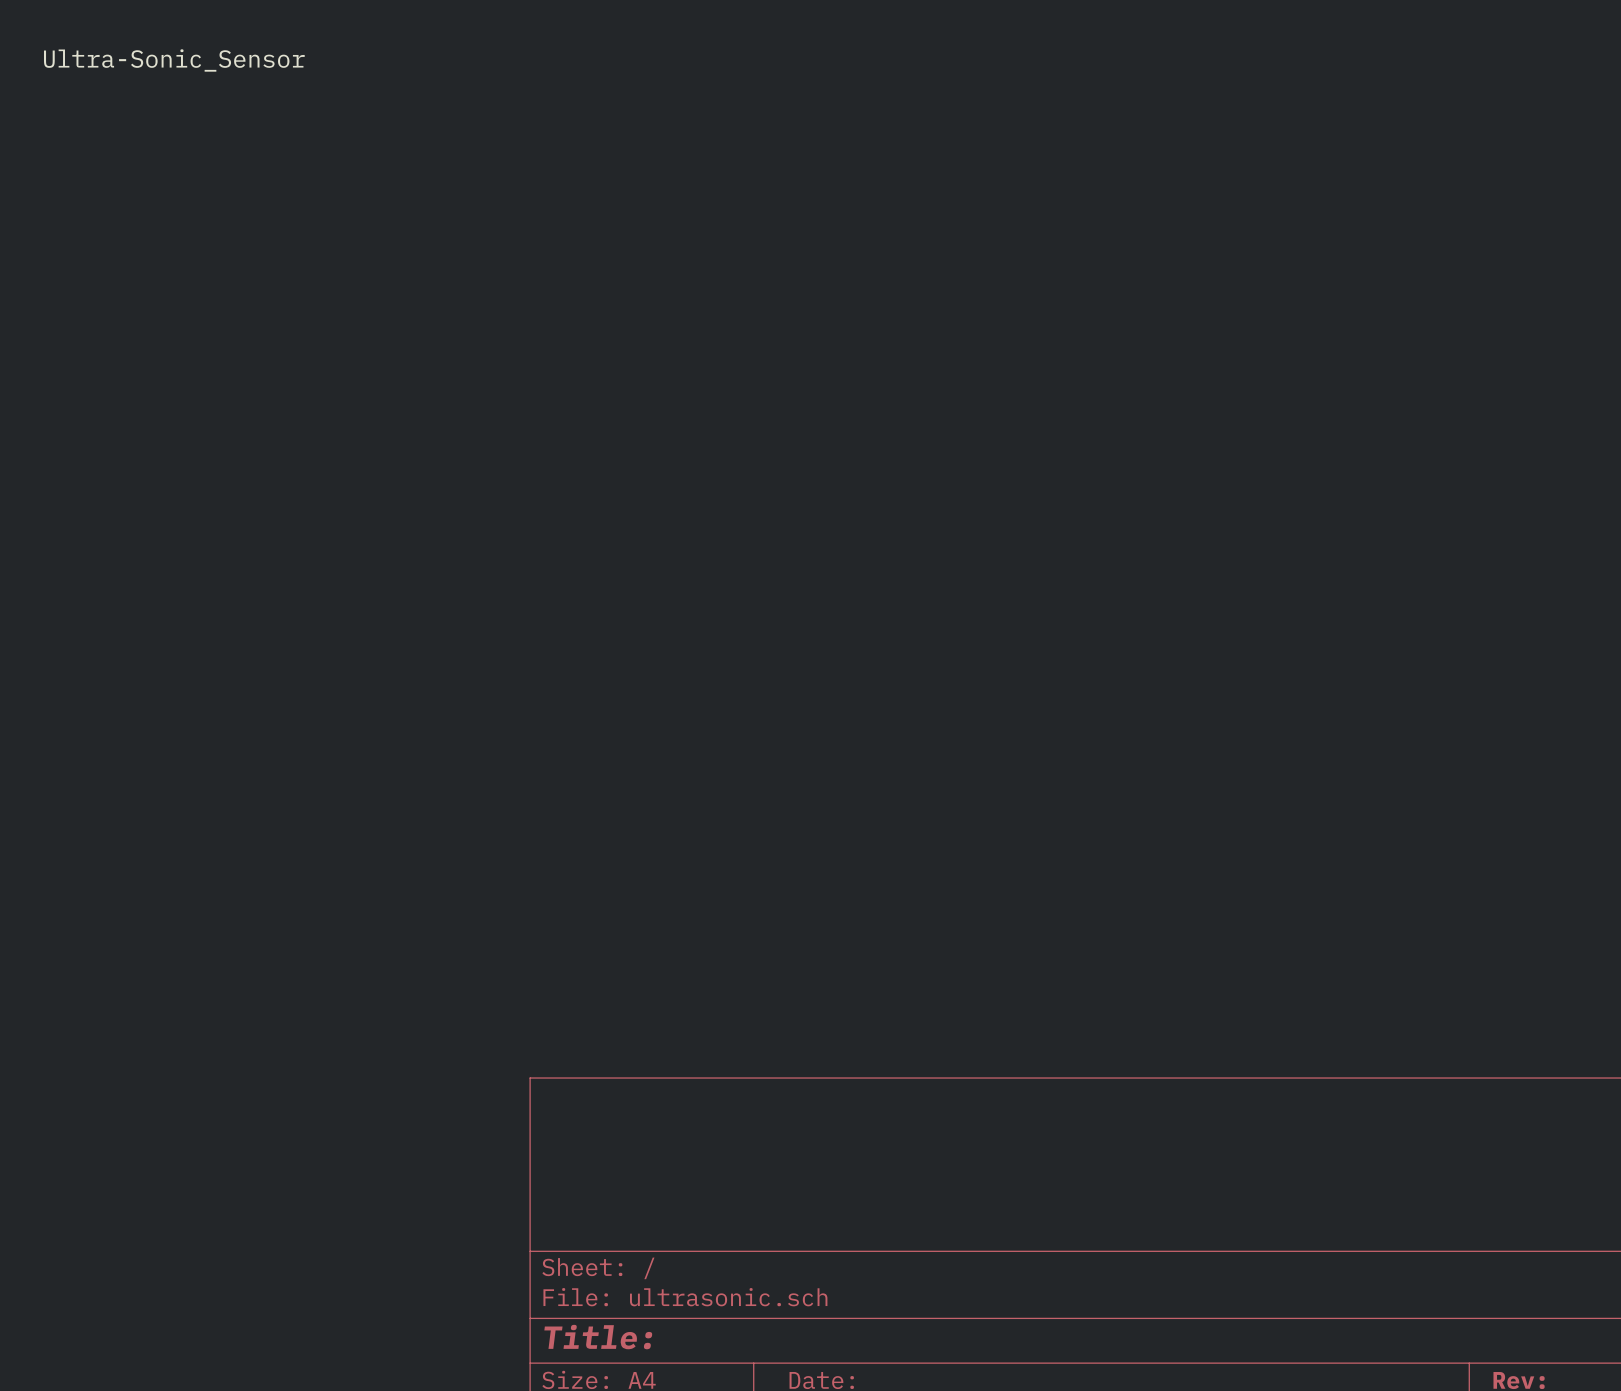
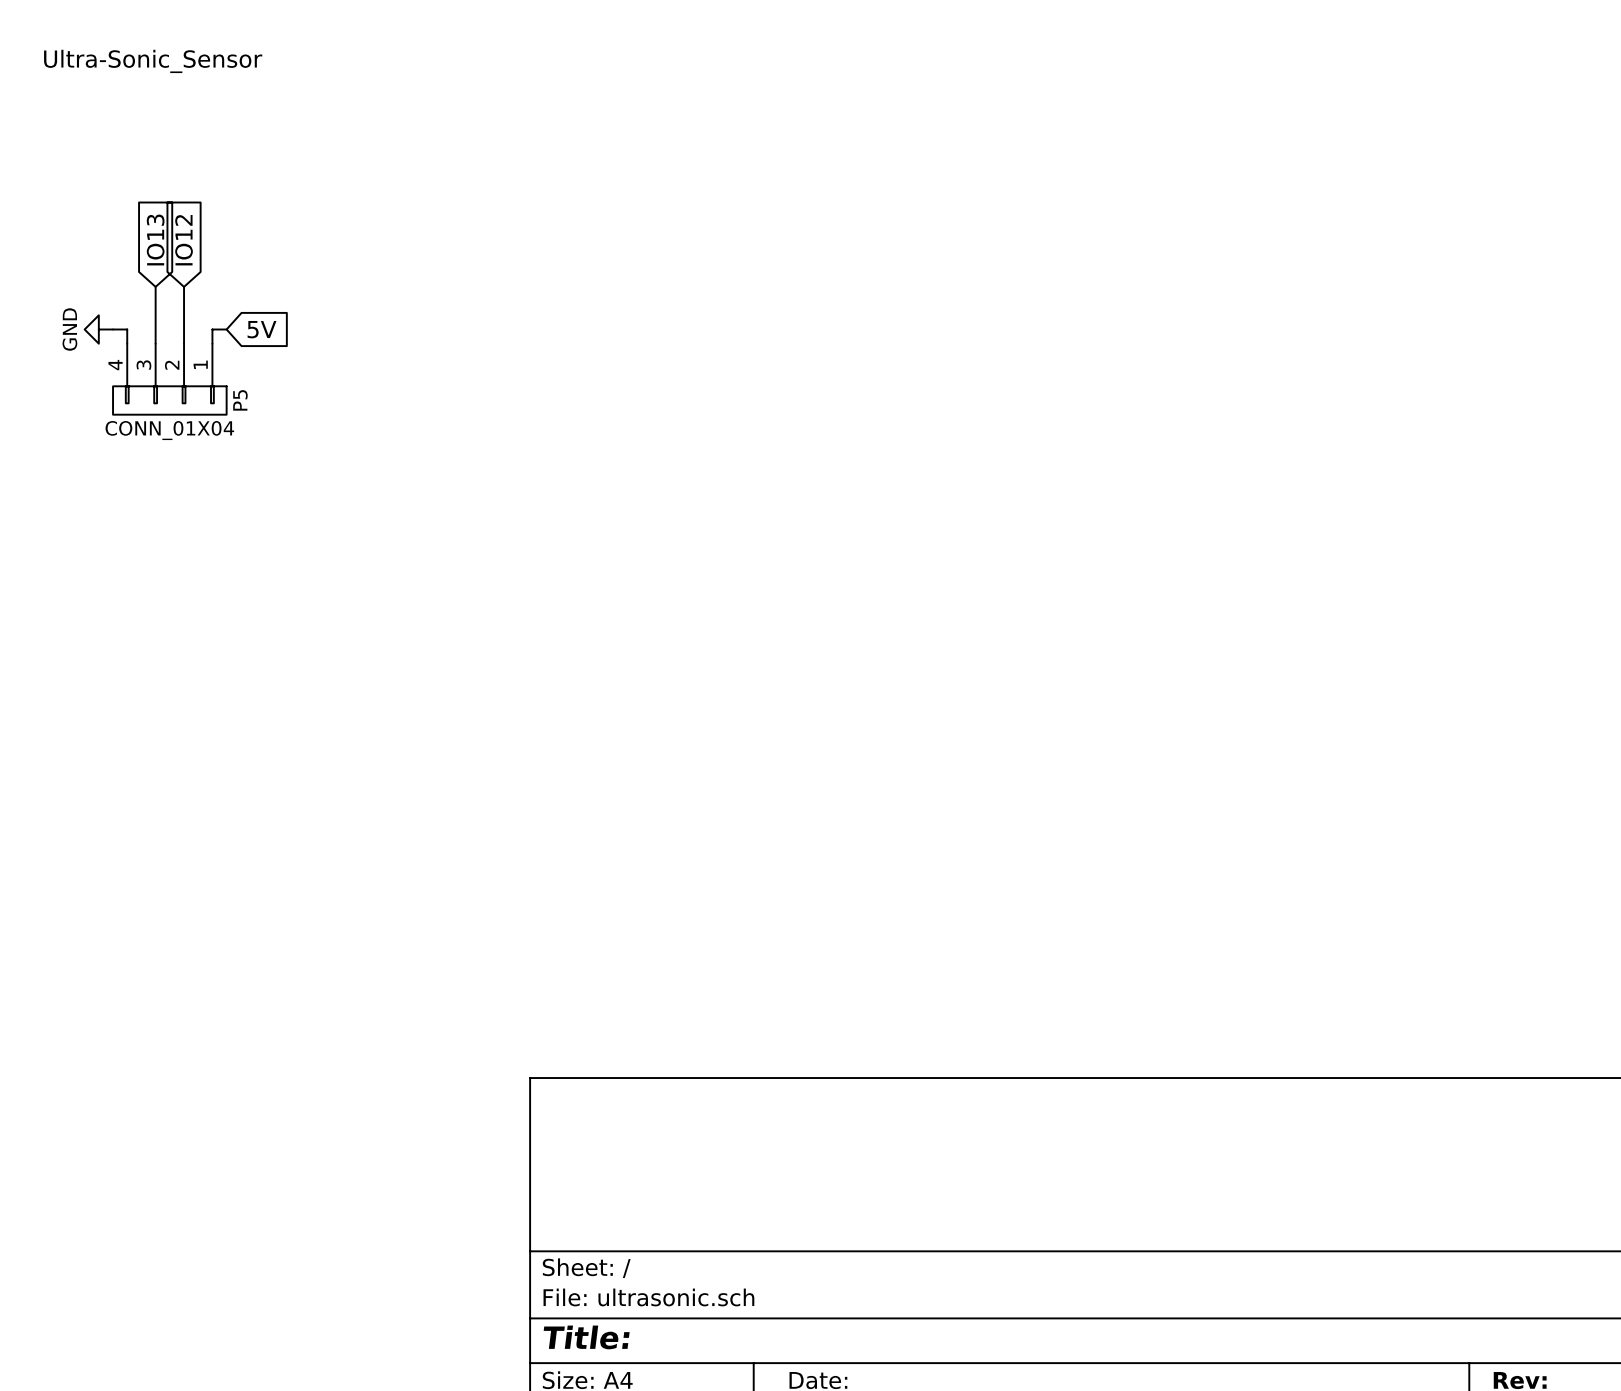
global label: none -> IO13 (155, 240)
global label: none -> IO12 (184, 240)
wire: none -> (155, 286) (155, 343)
wire: none -> (184, 286) (184, 343)
power symbol: none -> GND (98, 329)
wire: none -> (113, 329) (127, 329) (127, 343)
wire: none -> (226, 329) (212, 329) (212, 343)
global label: none -> 5V (262, 329)
P5: none -> CONN_01X04 (169, 379)

